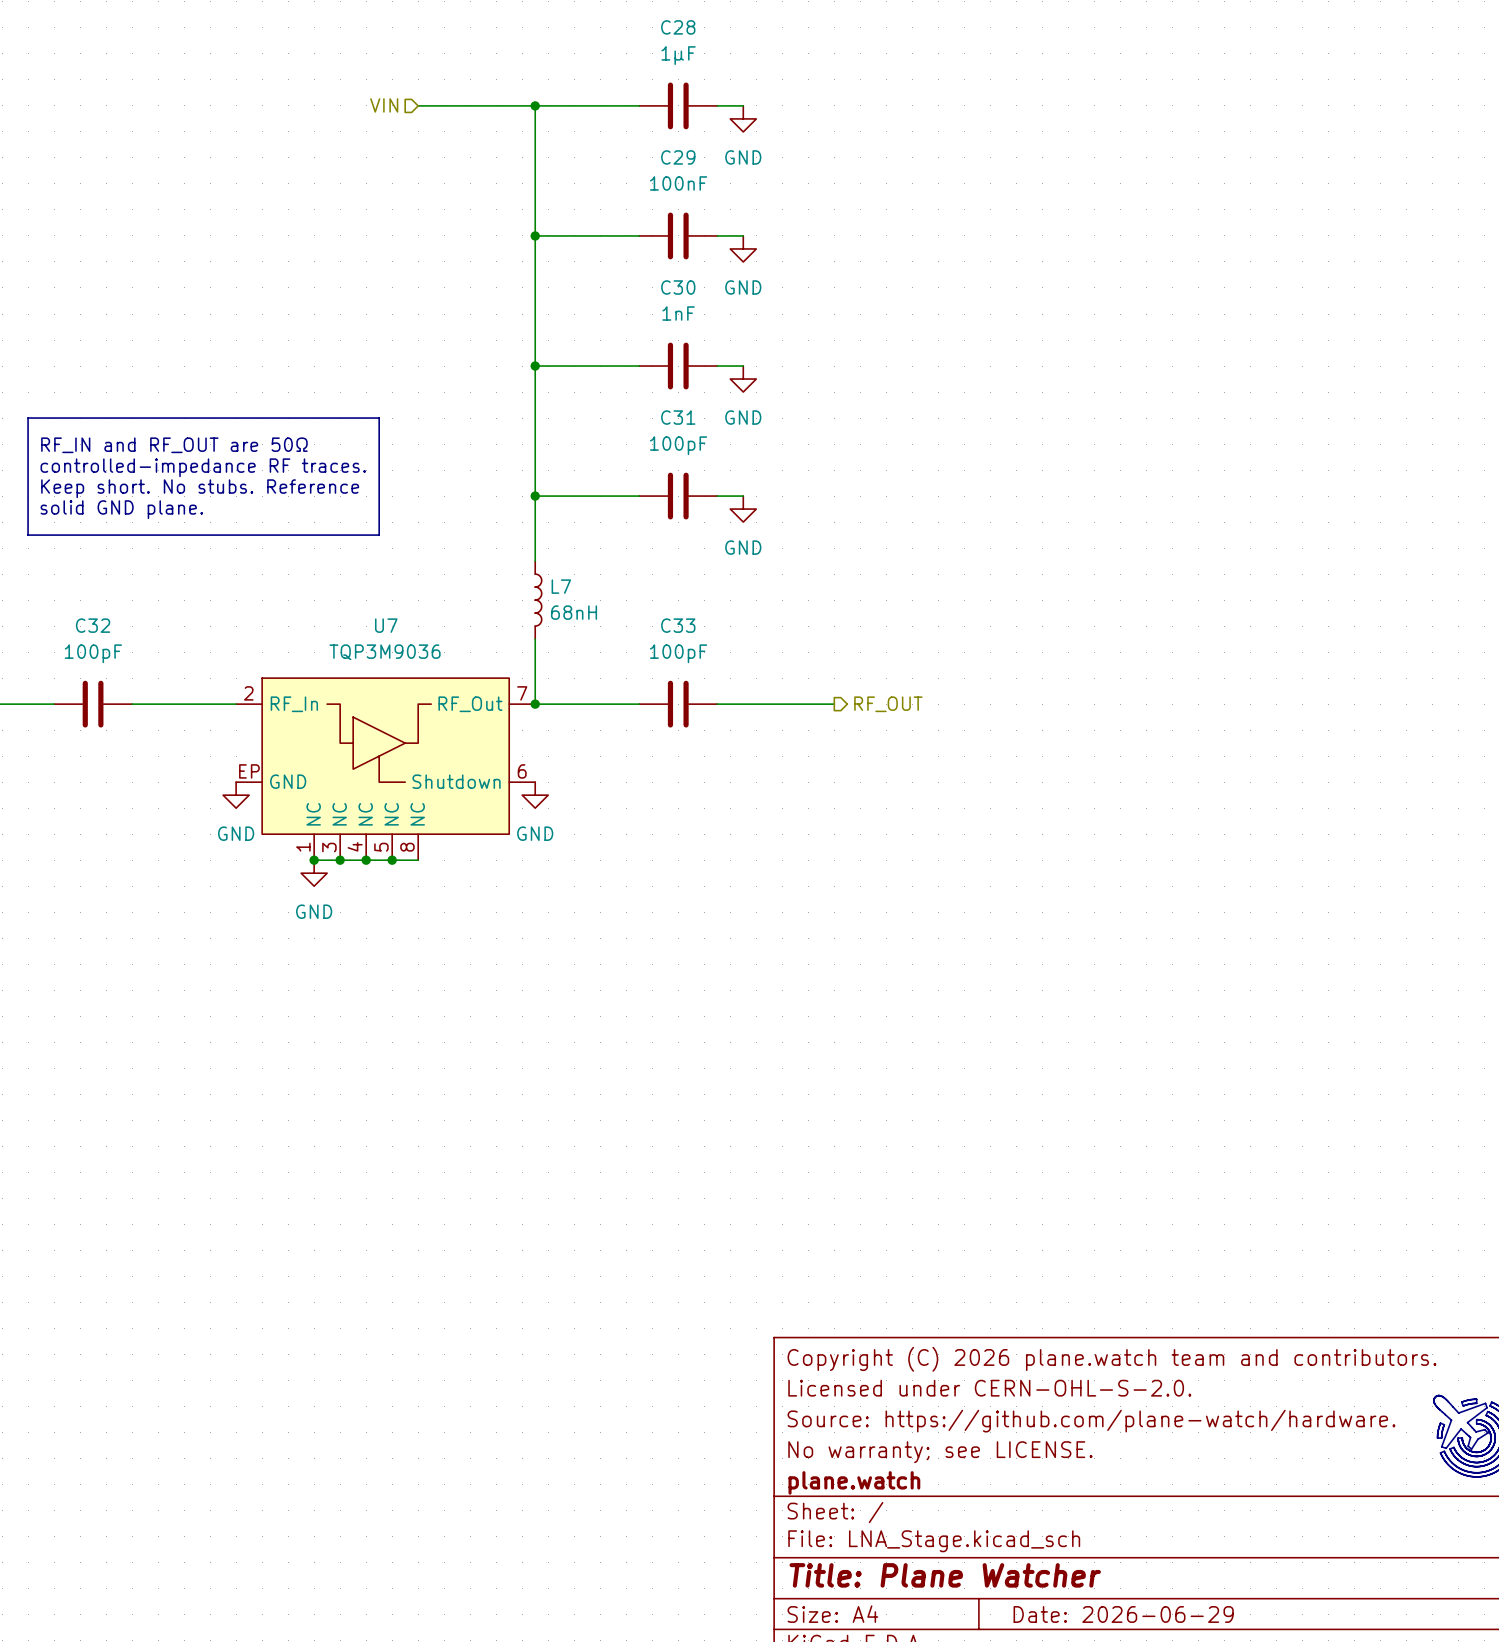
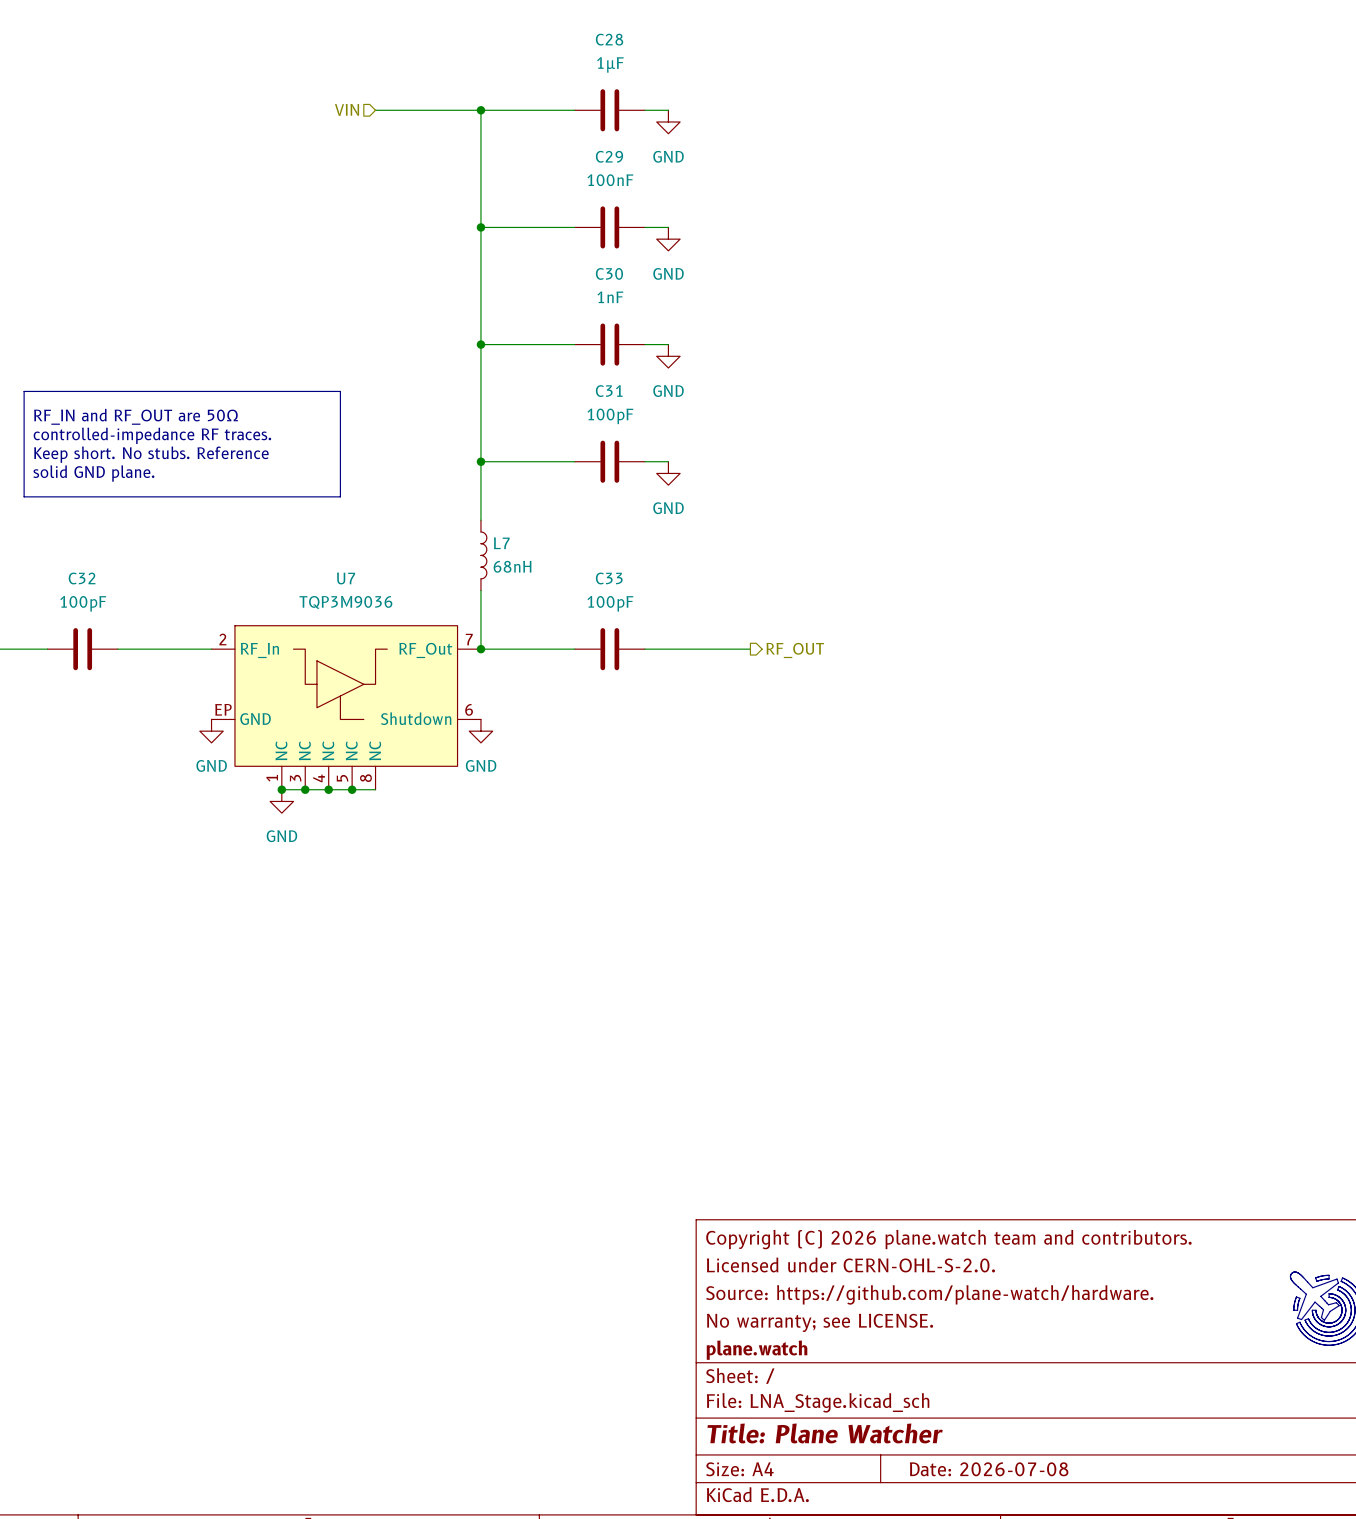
title block: Date: 2026-06-29 (1123, 1614) -> Date: 2026-07-08 (989, 1469)

